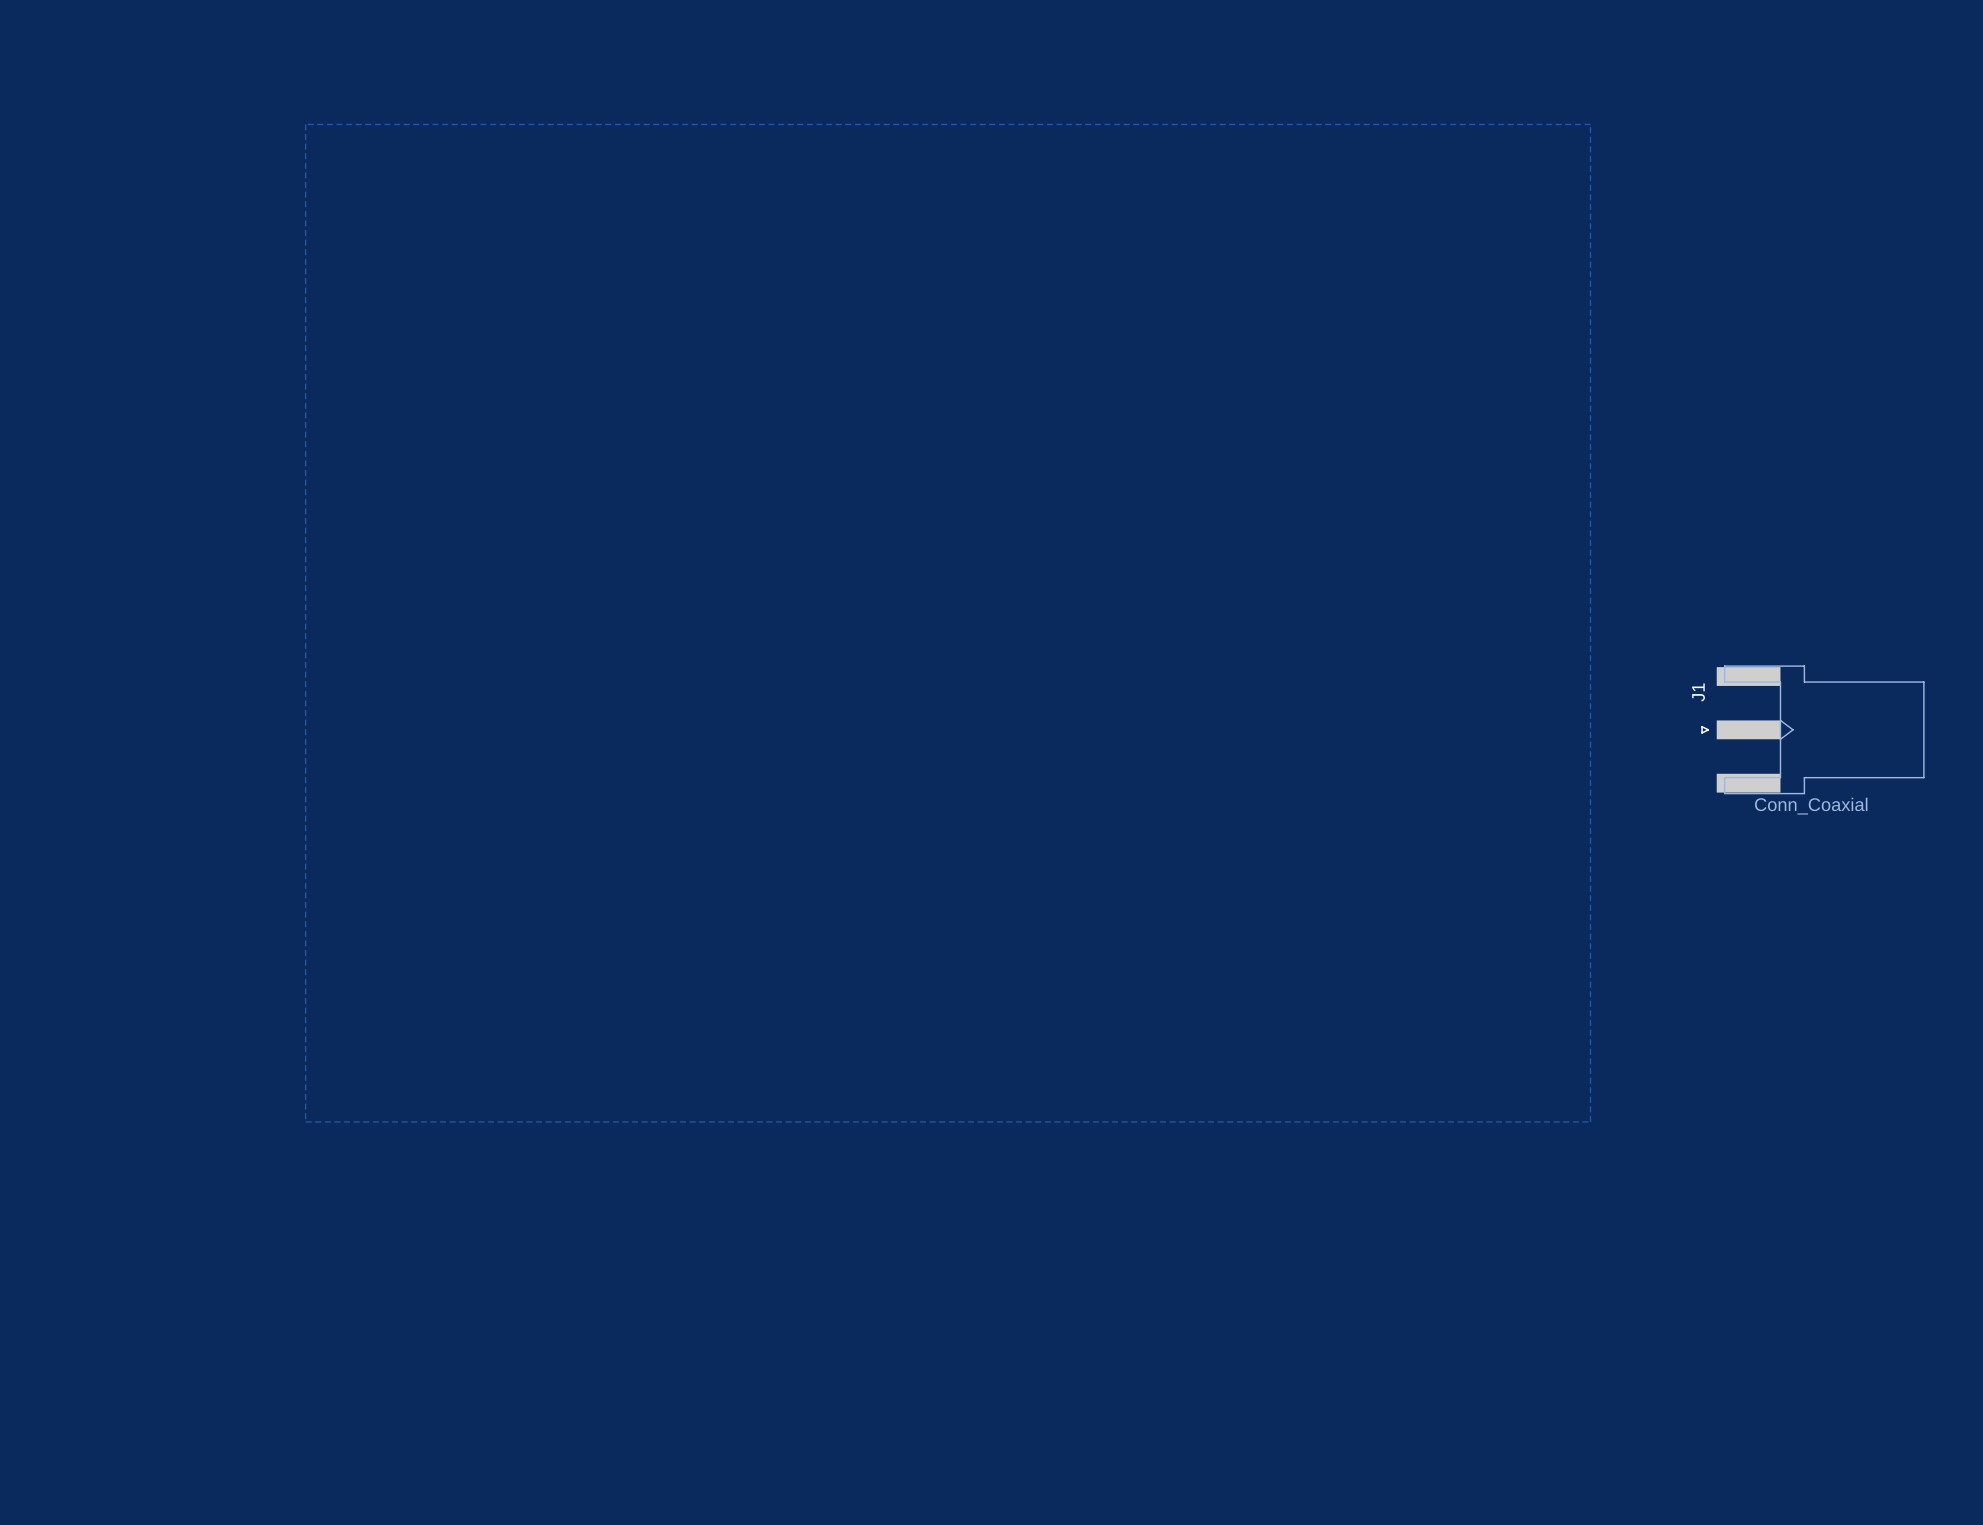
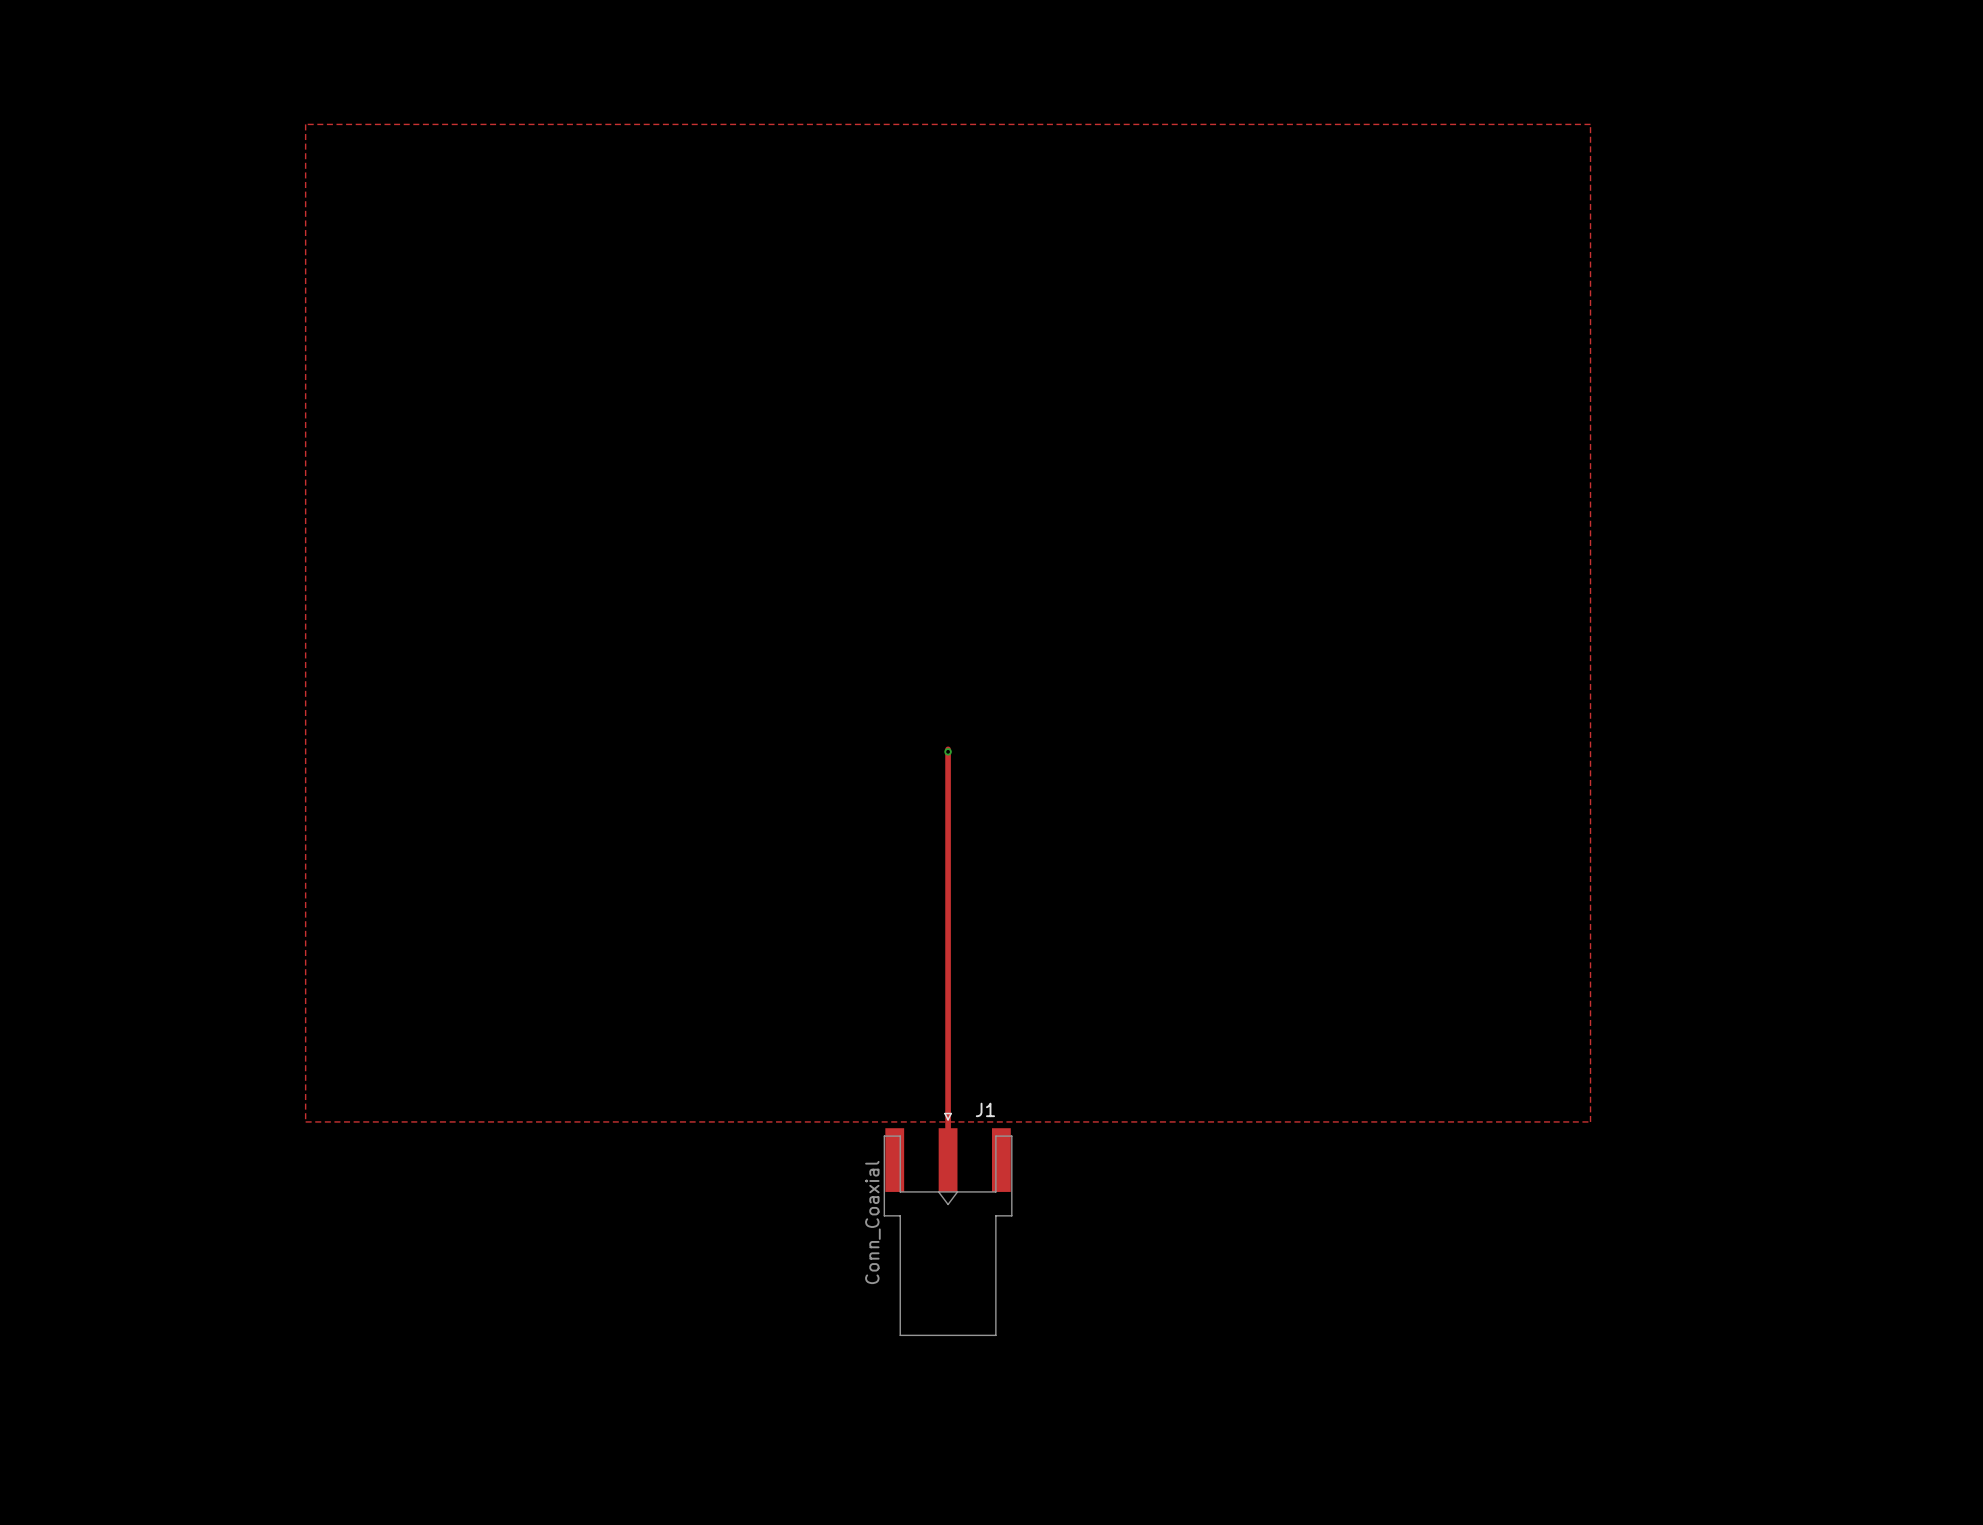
J1 rotation: 0° (1812, 729) -> 90° clockwise (948, 1224)
J1 position: (1812, 729) -> (948, 1224)
track: none -> (948, 749) (948, 1160)
via: none -> (948, 751)

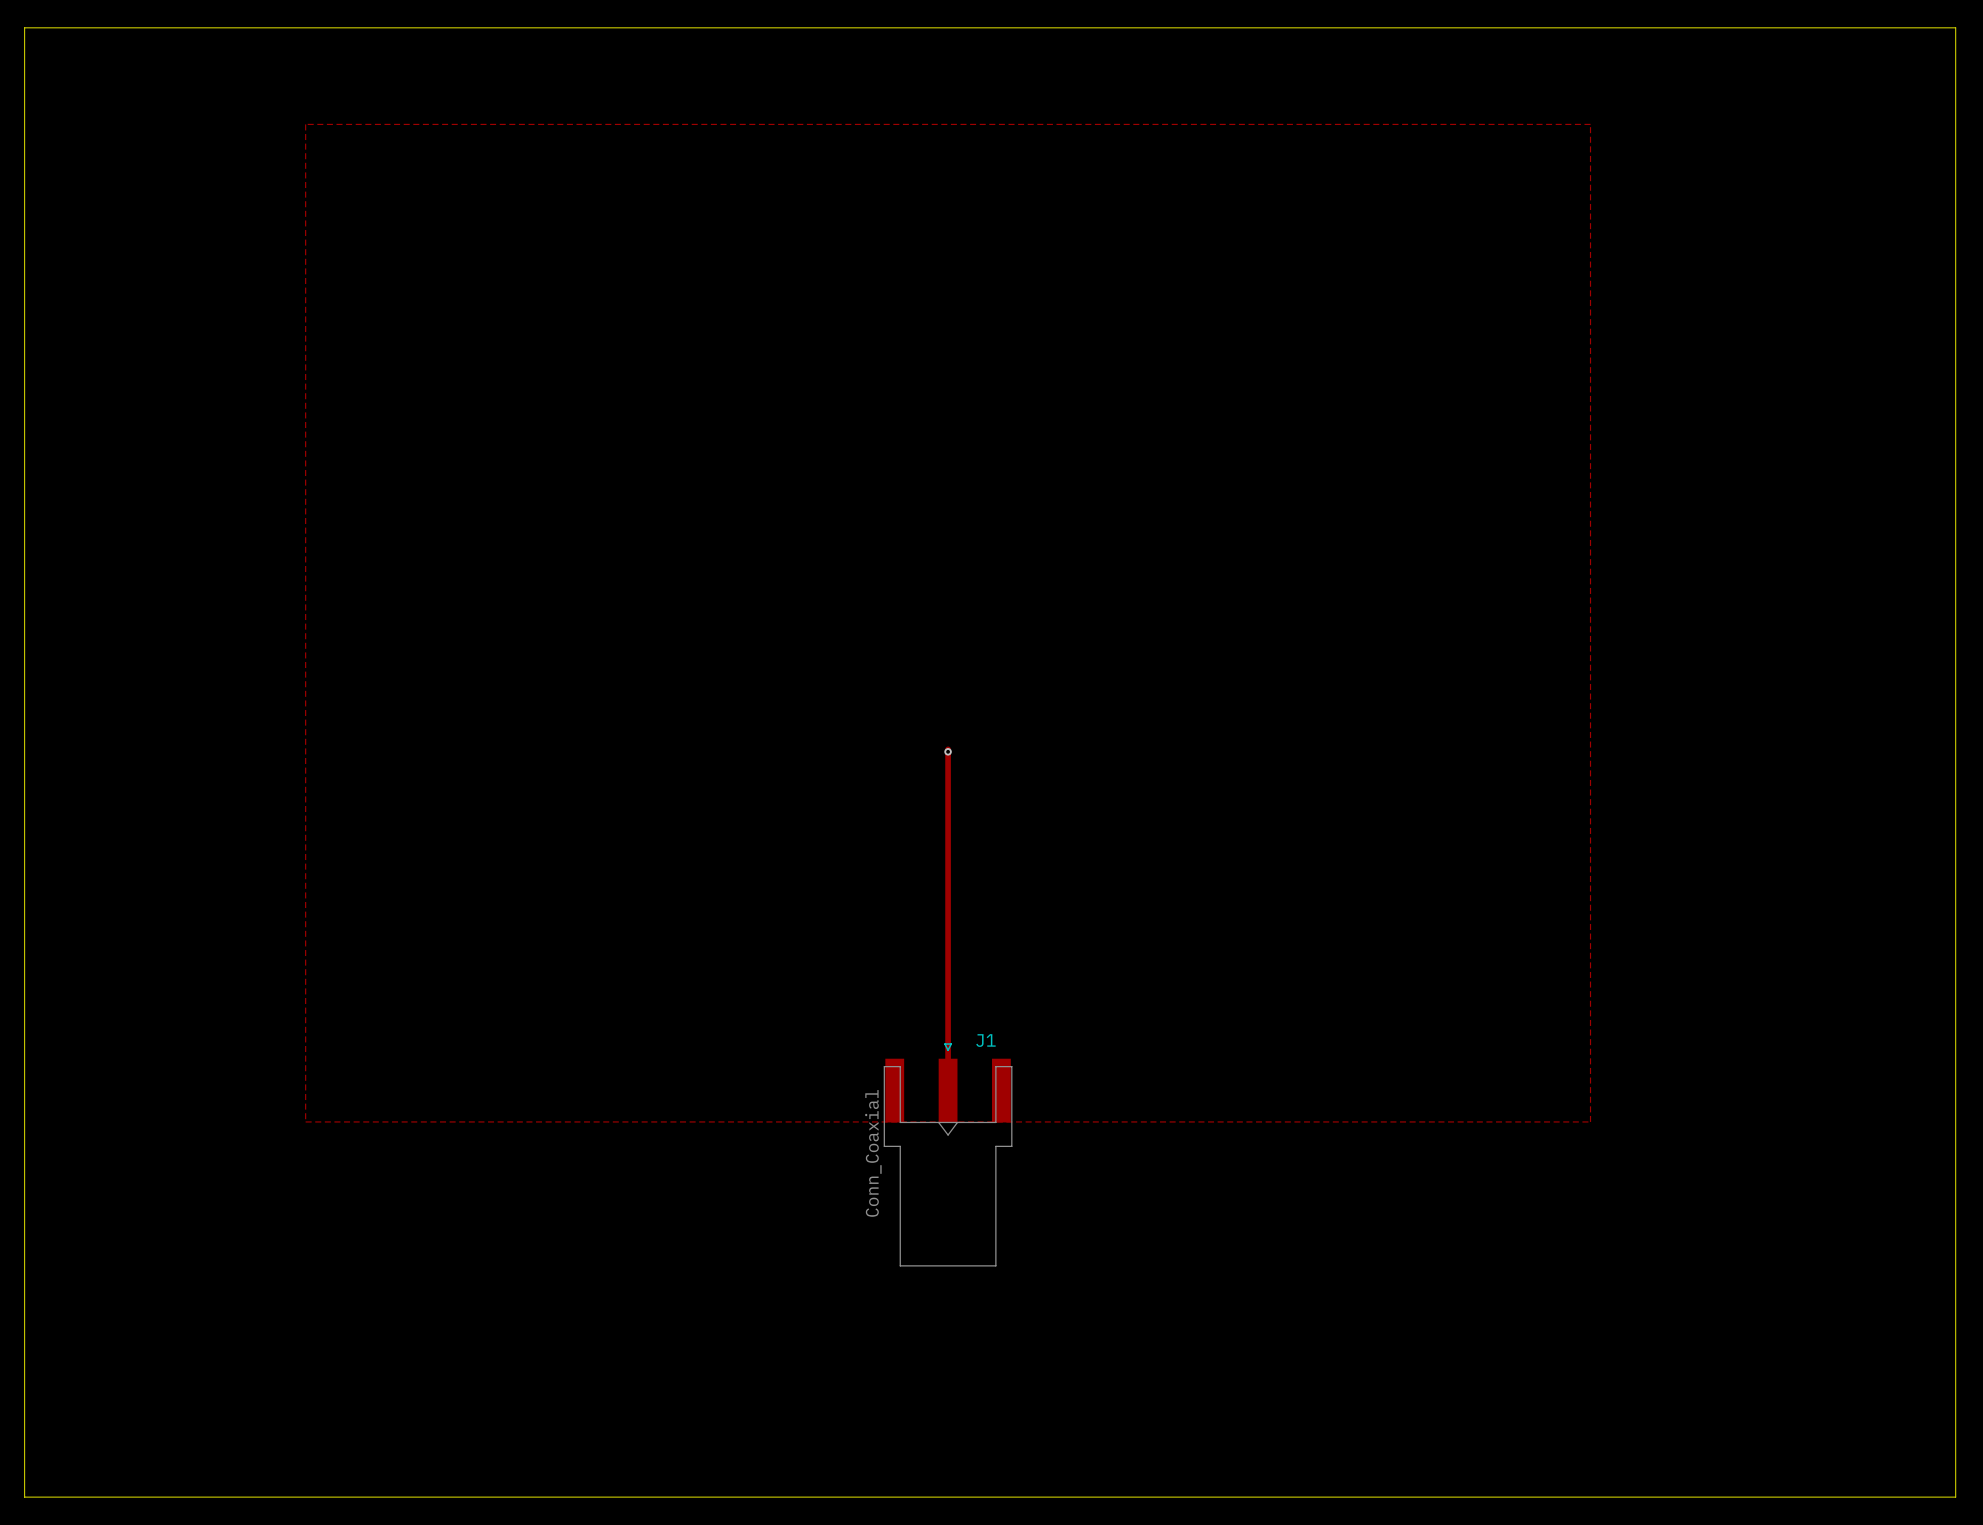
board edge: none -> (24, 27) (1955, 27) (1955, 1497) (24, 1497) (24, 27)
track: (948, 1090) (948, 1160) -> none
J1 position: (948, 1224) -> (948, 1154)

